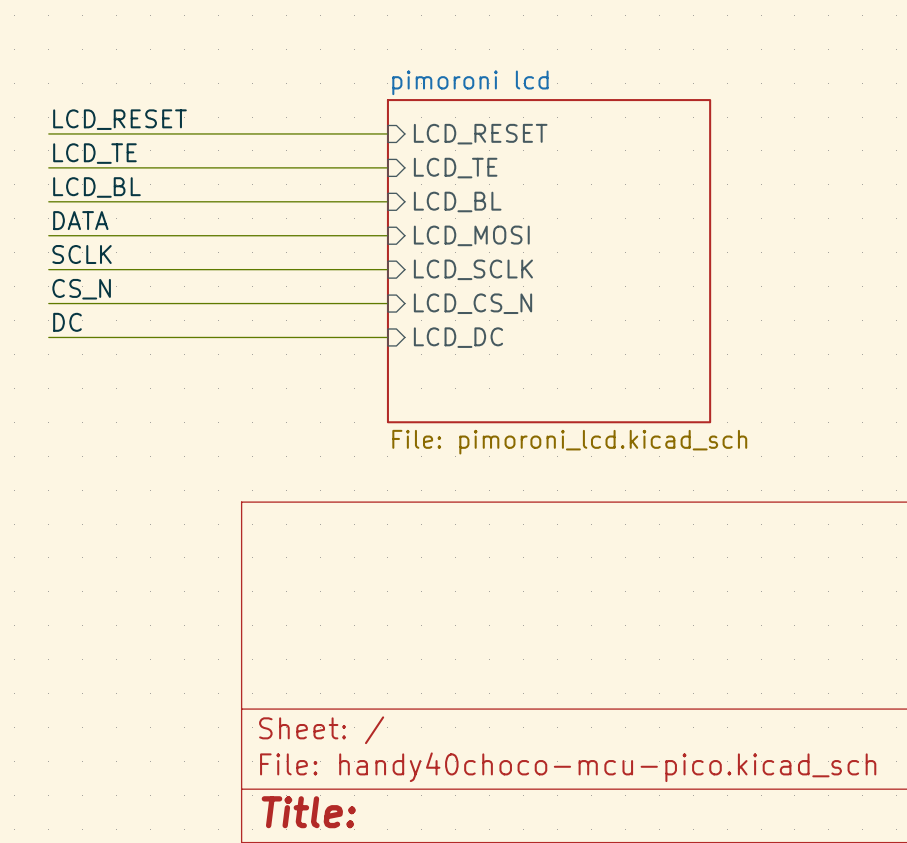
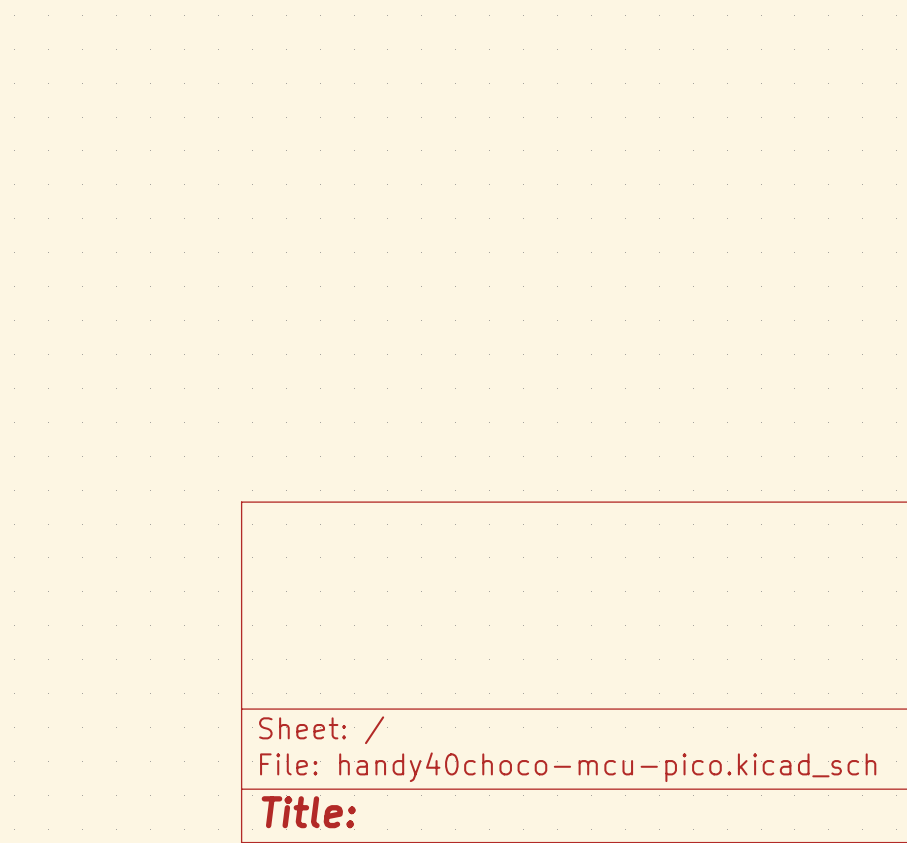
label: LCD_RESET (119, 119) -> none
wire: (48, 133) (387, 133) -> none
sheet pin: LCD_RESET (480, 134) -> none
label: LCD_TE (94, 153) -> none
wire: (48, 167) (387, 167) -> none
sheet pin: LCD_TE (455, 168) -> none
label: LCD_BL (96, 187) -> none
wire: (48, 201) (387, 201) -> none
sheet pin: LCD_BL (457, 201) -> none
label: DATA (80, 220) -> none
wire: (48, 235) (387, 235) -> none
sheet pin: LCD_MOSI (471, 235) -> none
label: SCLK (82, 254) -> none
sheet pimoroni lcd: File: pimoroni_lcd.kicad_sch (549, 261) -> none
wire: (48, 269) (387, 269) -> none
sheet pin: LCD_SCLK (473, 269) -> none
label: CS_N (81, 289) -> none
wire: (48, 303) (387, 303) -> none
sheet pin: LCD_CS_N (473, 303) -> none
label: DC (67, 322) -> none
wire: (48, 337) (387, 337) -> none
sheet pin: LCD_DC (458, 337) -> none

